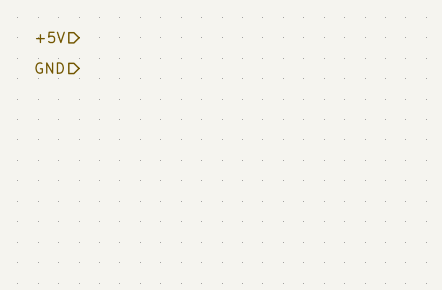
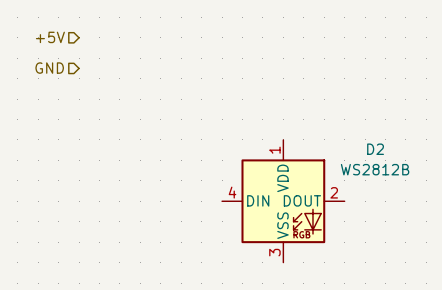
D2: none -> WS2812B (283, 201)

